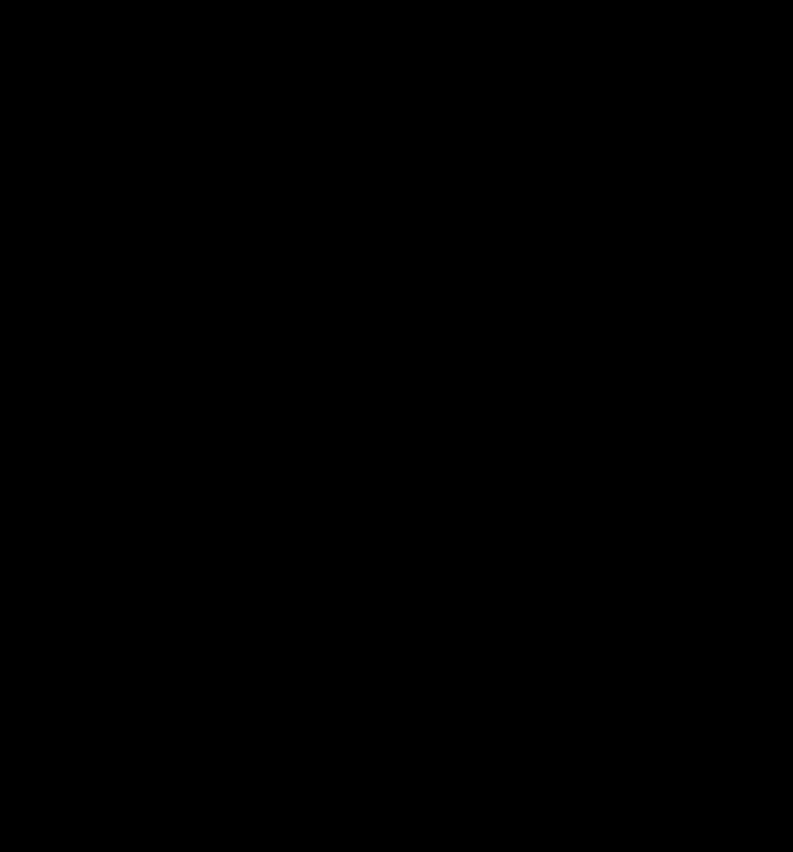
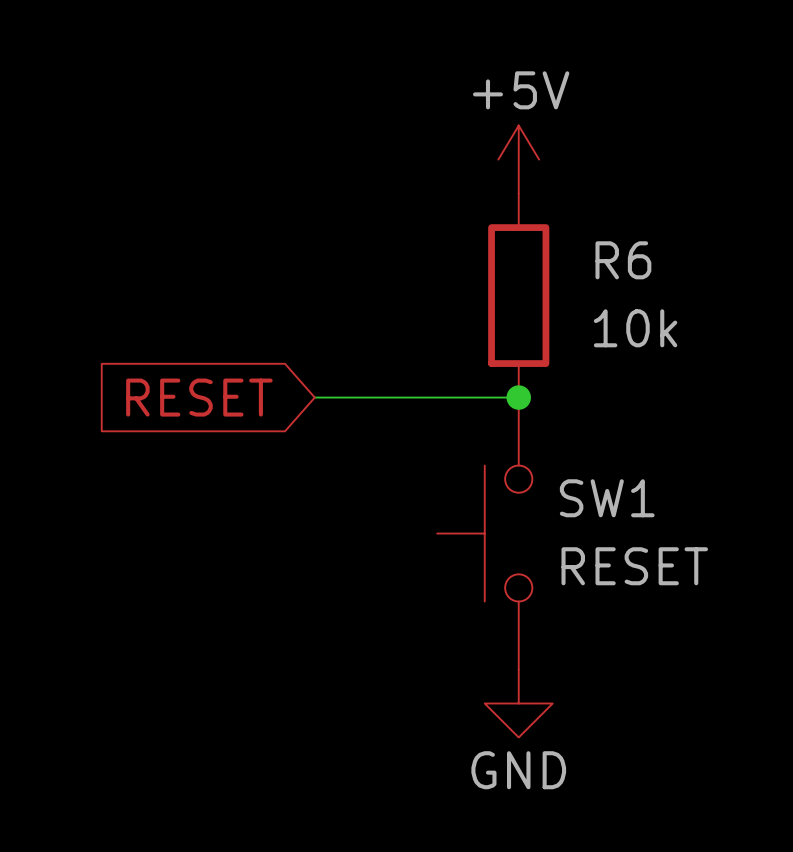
power symbol: none -> +5V (518, 159)
R6: none -> 10k (518, 295)
global label: none -> RESET (199, 397)
wire: none -> (314, 397) (518, 397)
junction: none -> (518, 397)
SW1: none -> RESET (484, 533)
power symbol: none -> GND (518, 703)

